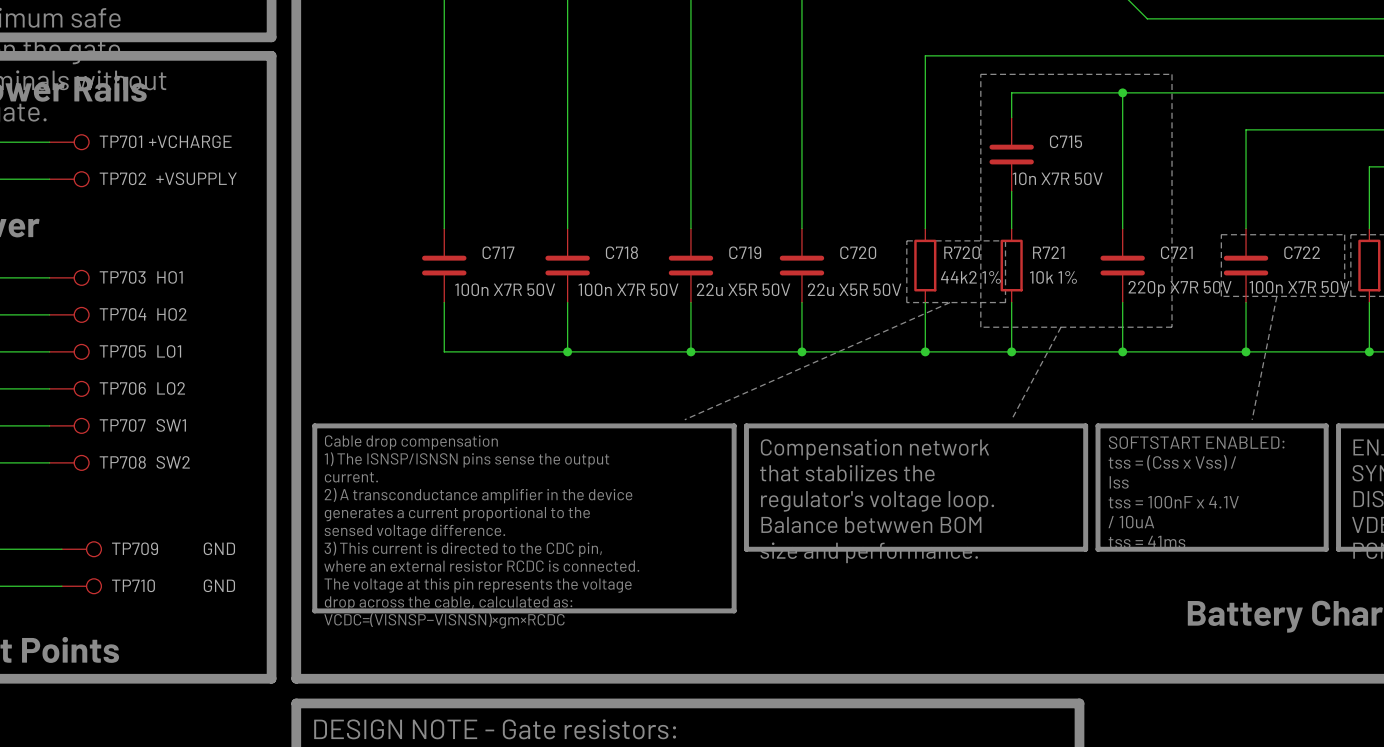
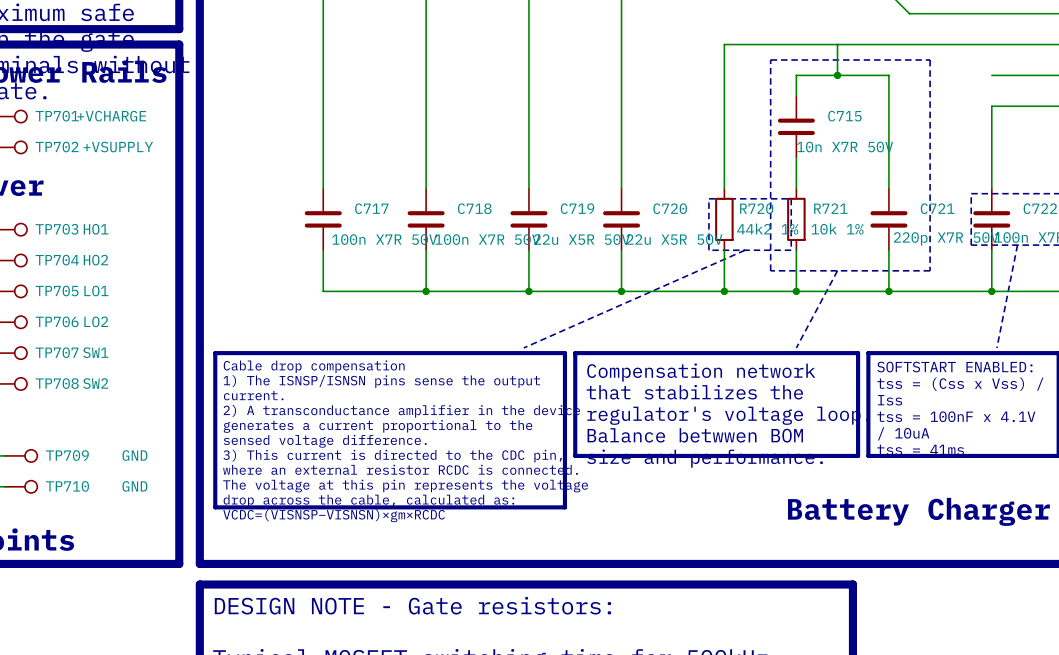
wire: none -> (837, 44) (837, 75)
junction: none -> (837, 75)
wire: (1122, 92) (1246, 92) -> none
junction: (1122, 92) -> none

